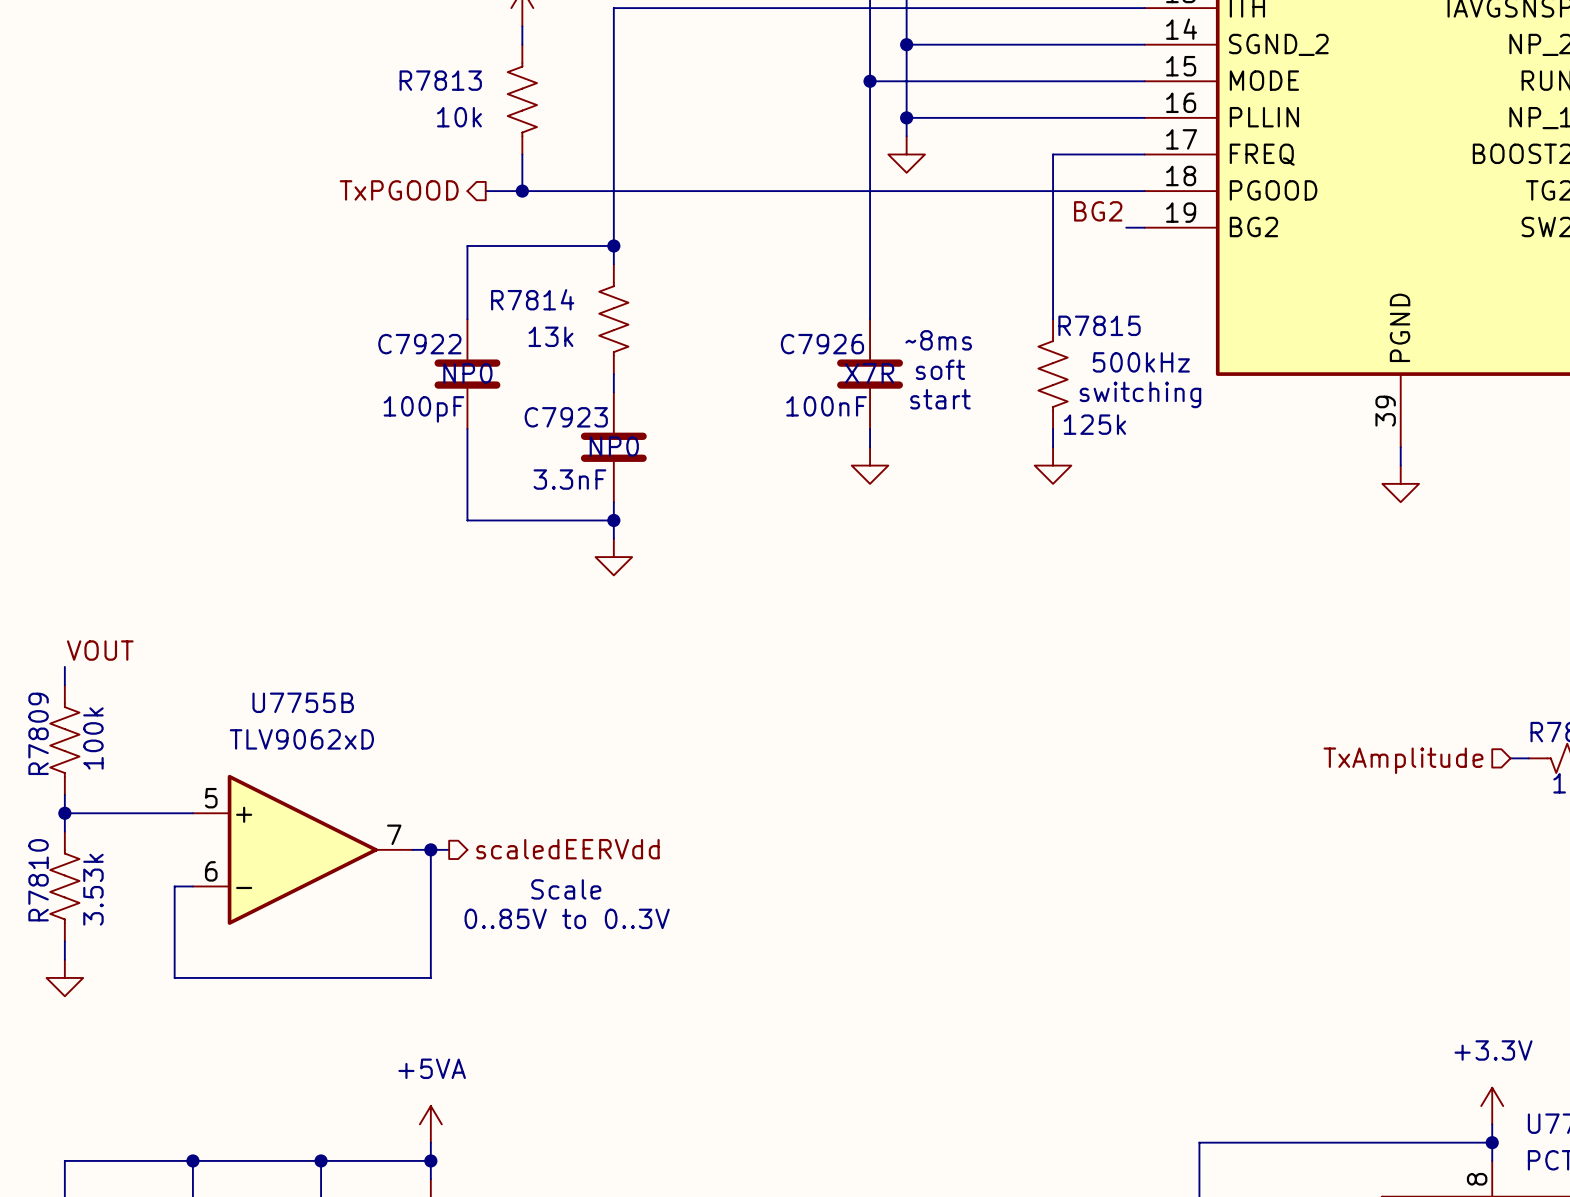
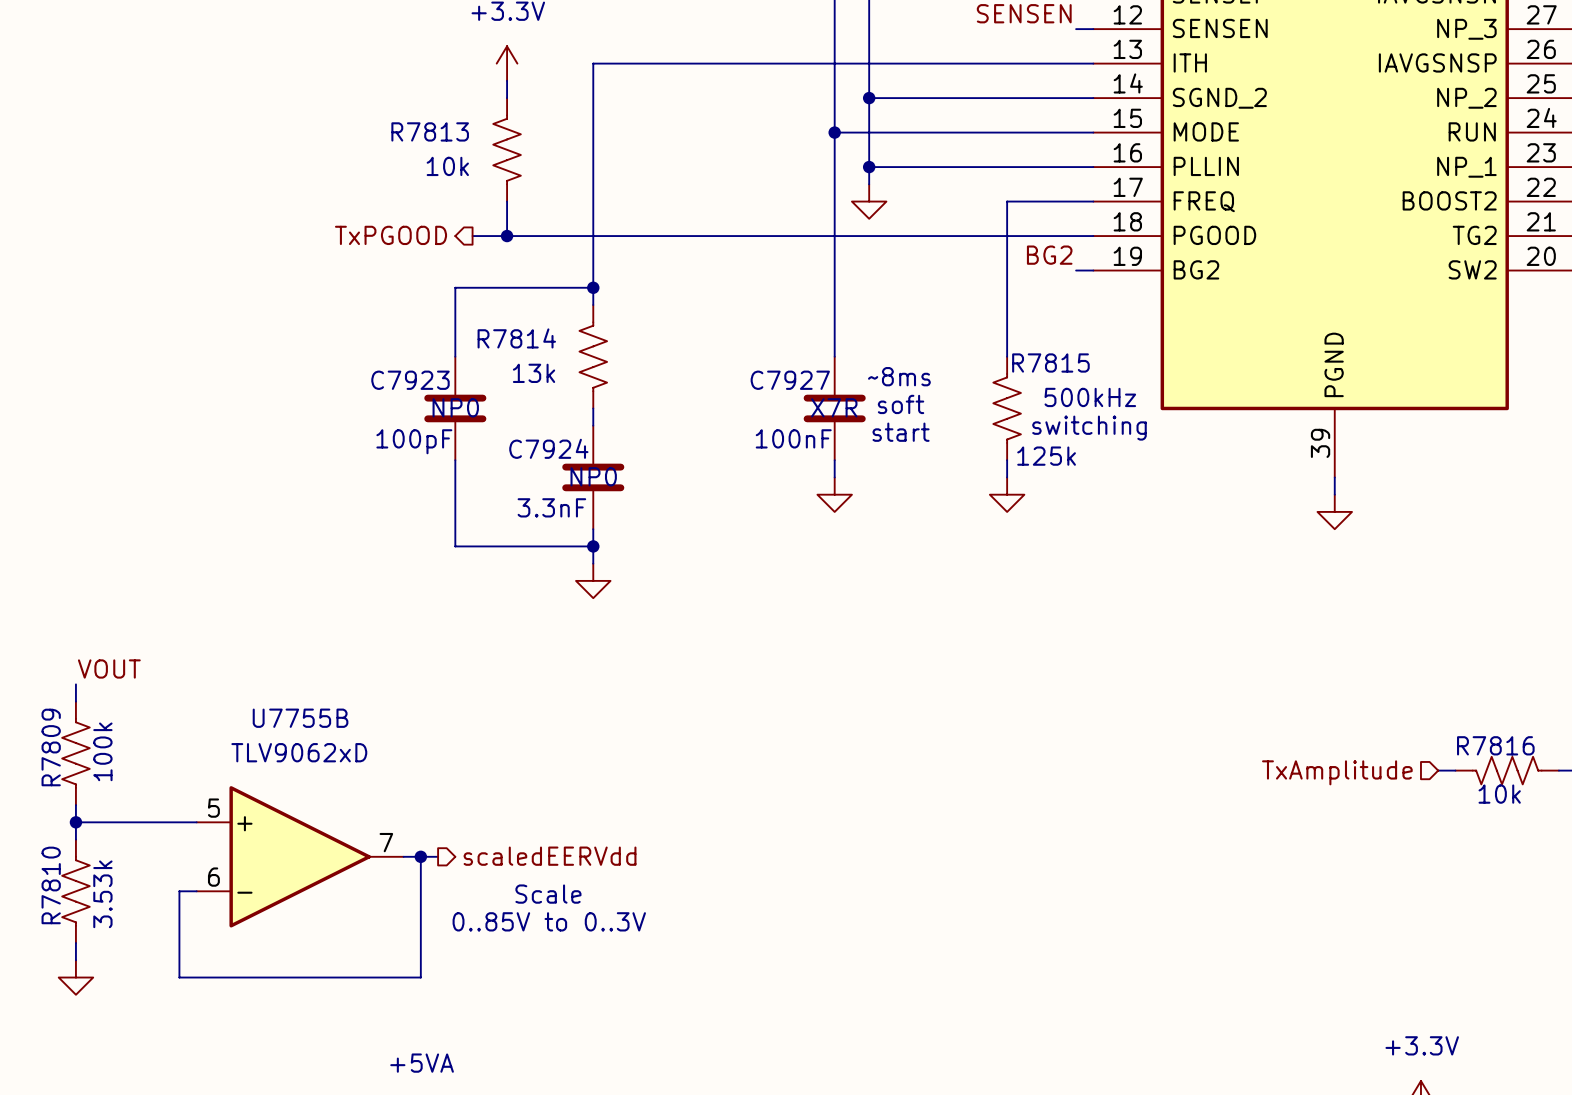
C7922 name: C7922 (419, 344) -> C7923 (410, 380)
C7926 name: C7926 (822, 344) -> C7927 (790, 380)
C7923 name: C7923 (566, 417) -> C7924 (548, 448)

